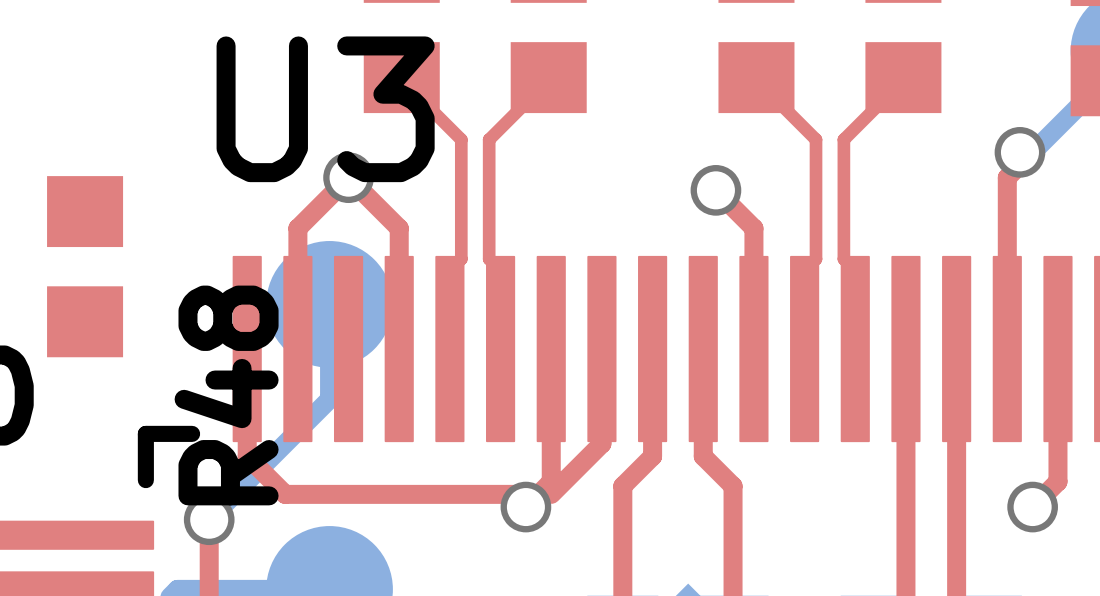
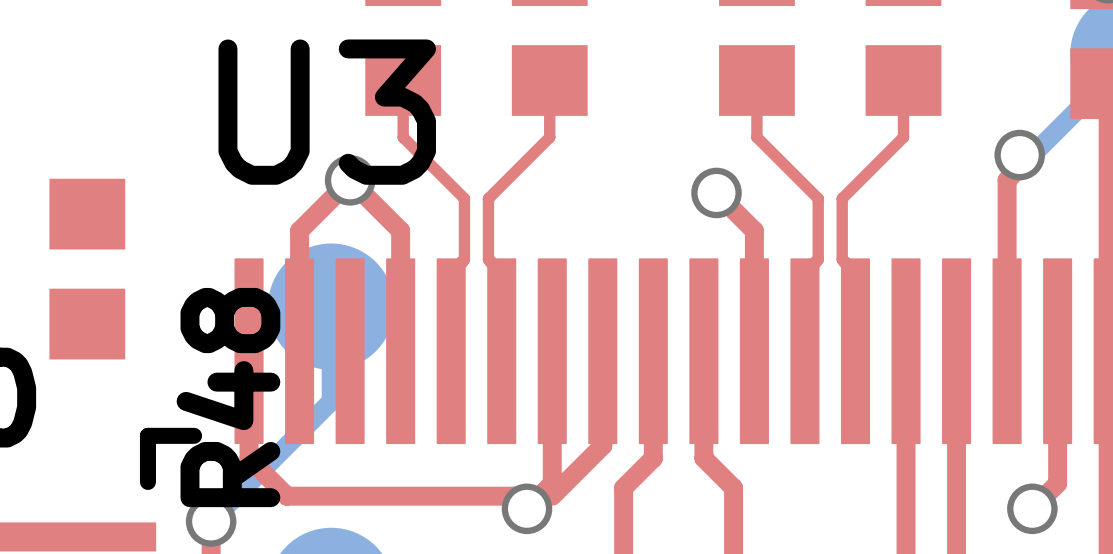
top track: (401, 80) (461, 139) (461, 259) -> (403, 80) (403, 137) (464, 198) (464, 259) (462, 261)
top track: (548, 80) (489, 139) (489, 259) -> (549, 80) (549, 137) (488, 198) (488, 259) (490, 261)
top track: (756, 80) (816, 139) (816, 259) -> (756, 80) (756, 137) (818, 198) (818, 259) (816, 261)
top track: (903, 80) (843, 139) (843, 259) -> (903, 80) (903, 137) (842, 198) (842, 259) (844, 261)

